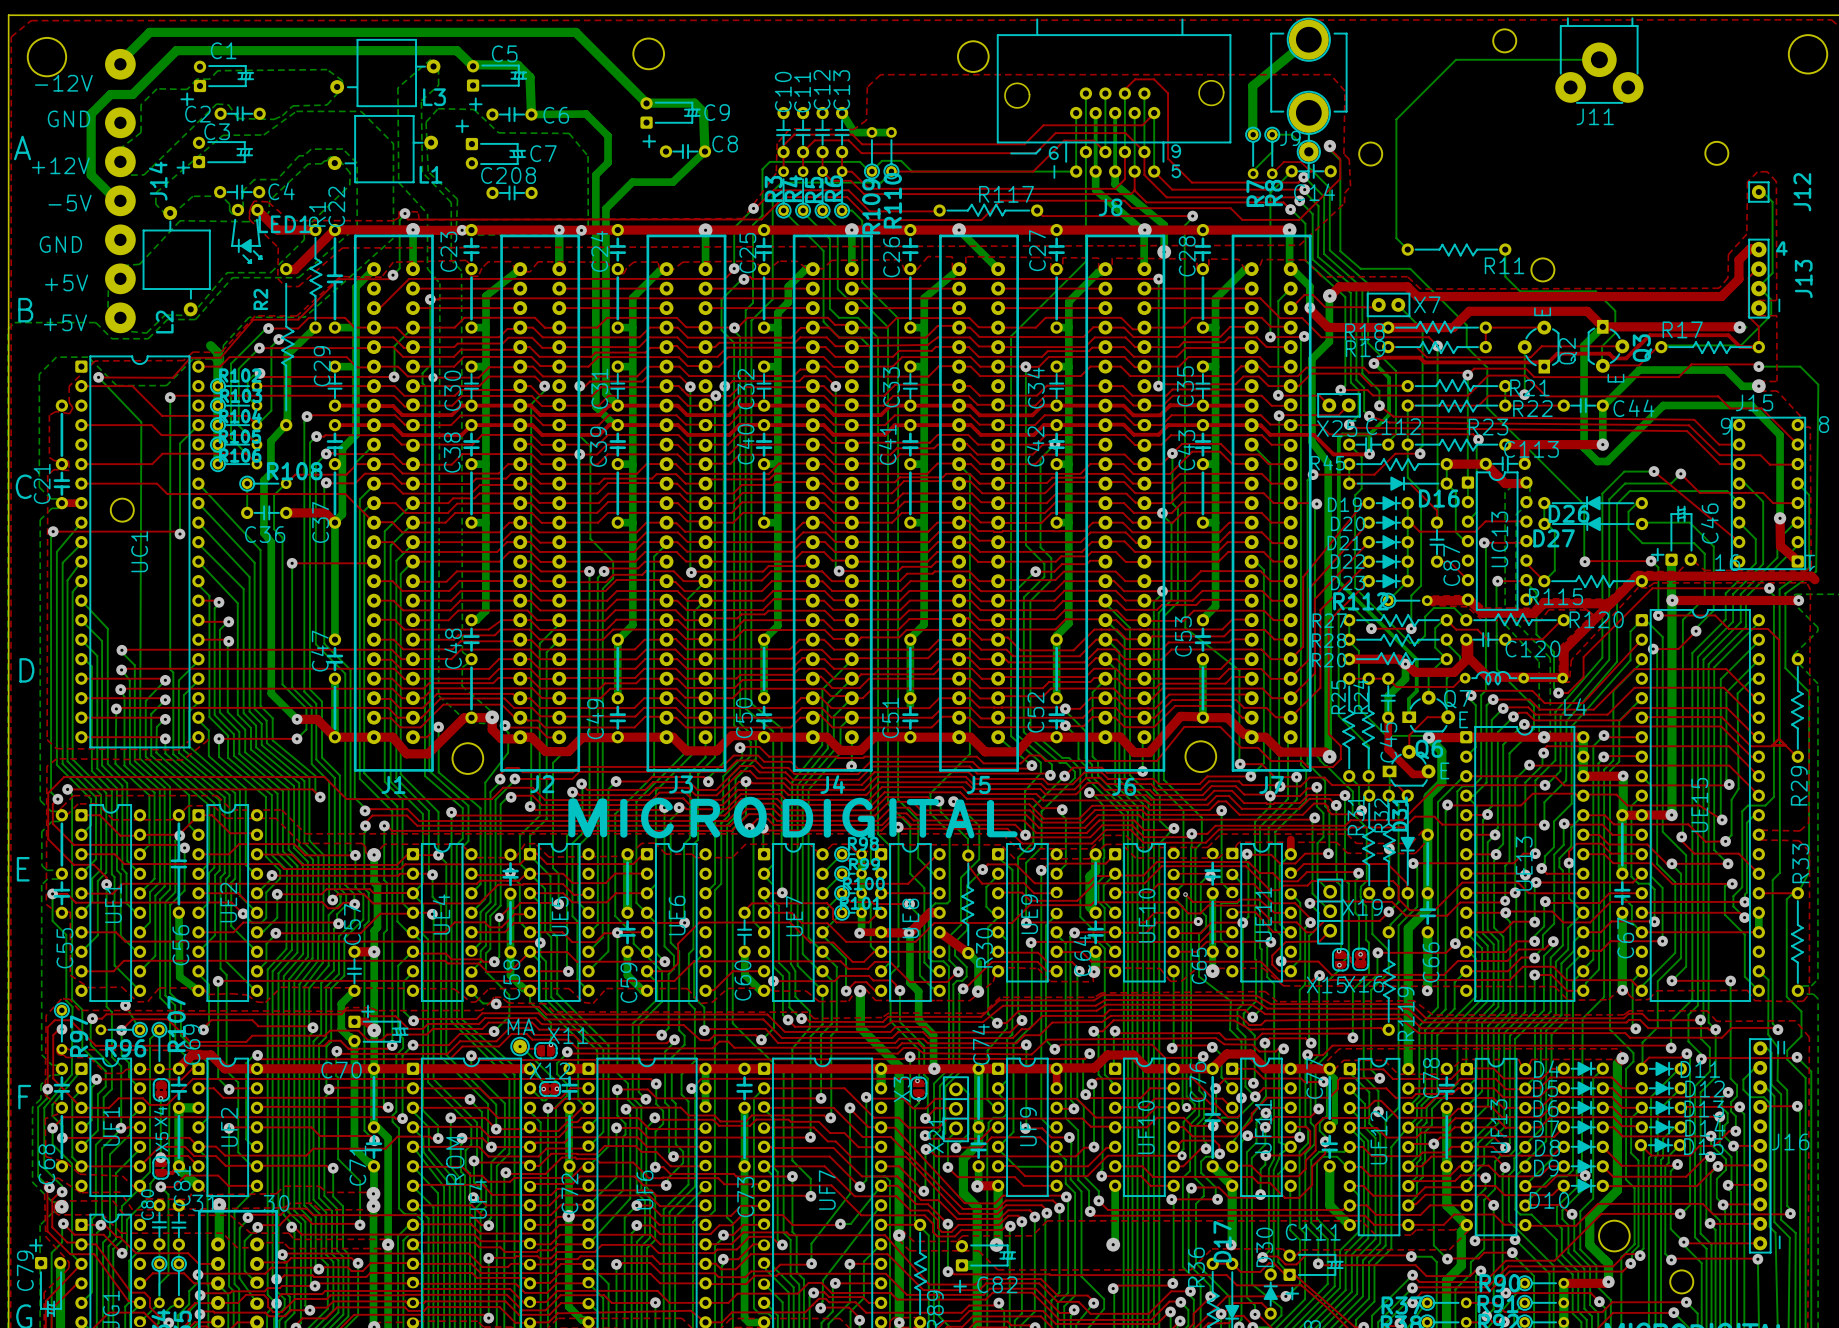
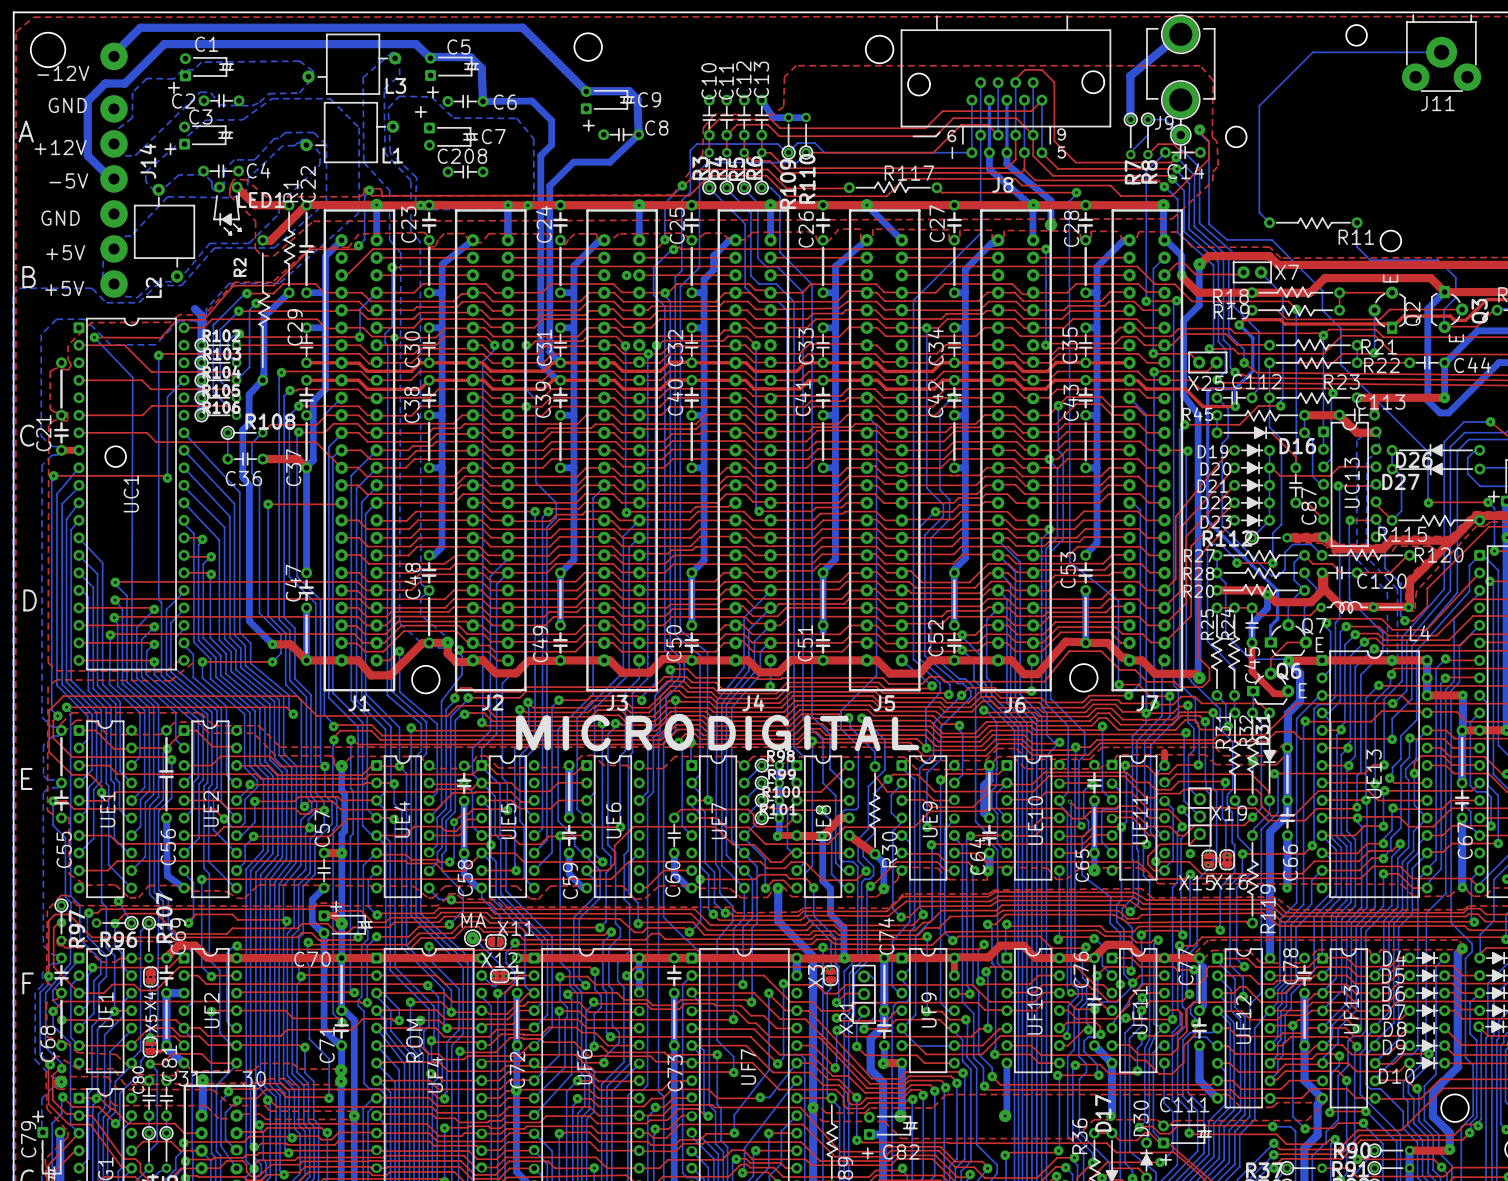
via: none -> (626, 275)
via: none -> (1190, 853)

